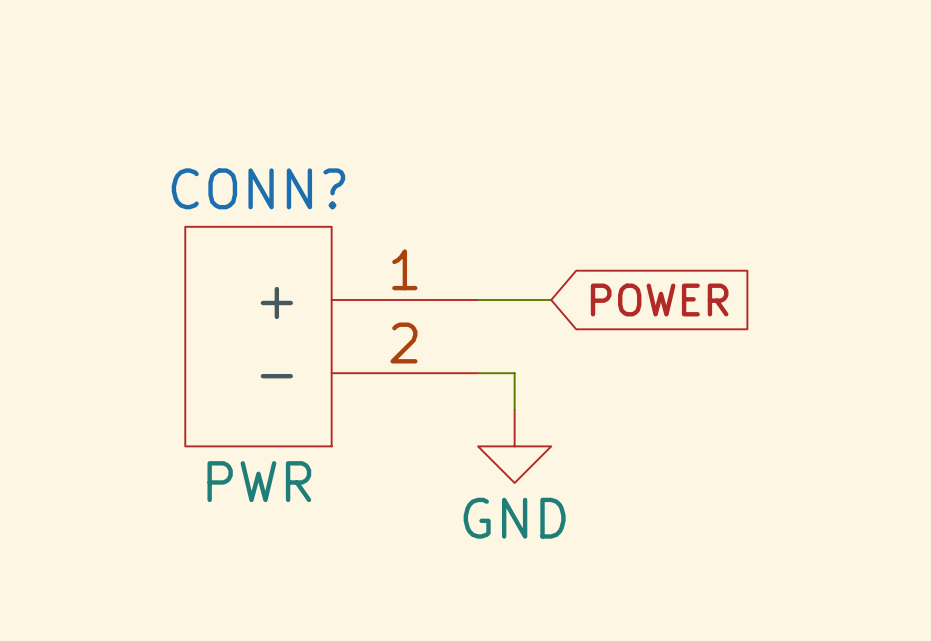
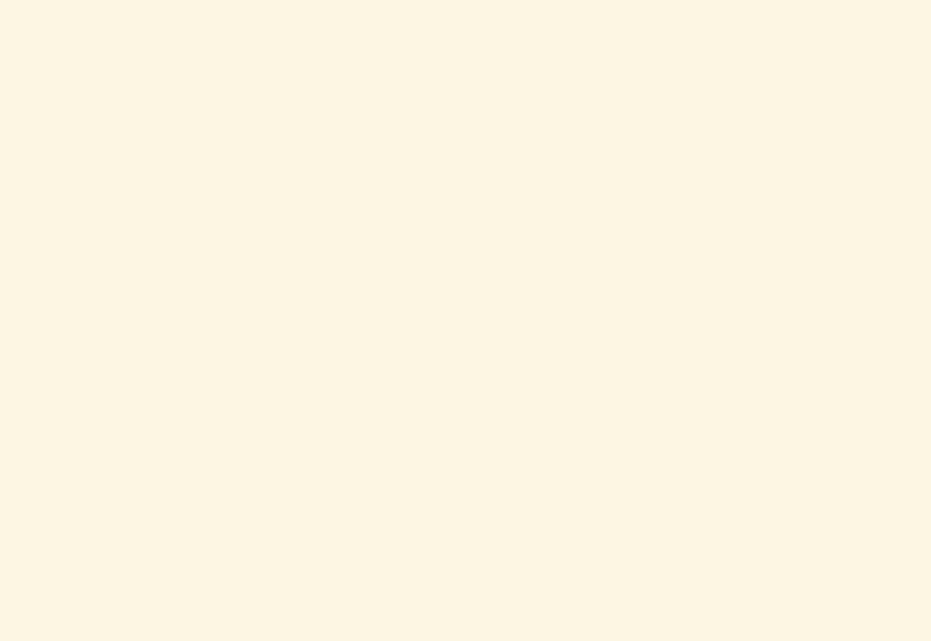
wire: (478, 300) (551, 300) -> none
global label: POWER (659, 300) -> none
CONN?: PWR (331, 336) -> none
wire: (478, 373) (514, 373) (514, 409) -> none
power symbol: GND (514, 446) -> none

